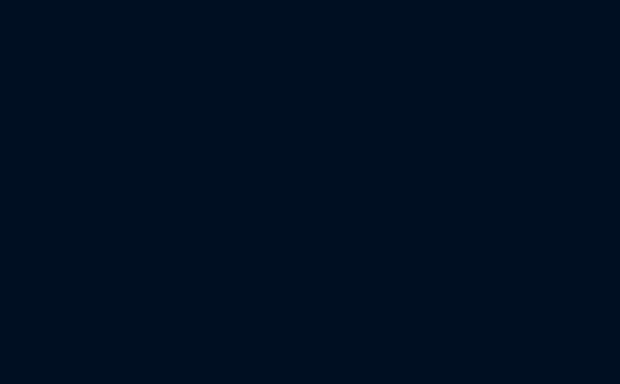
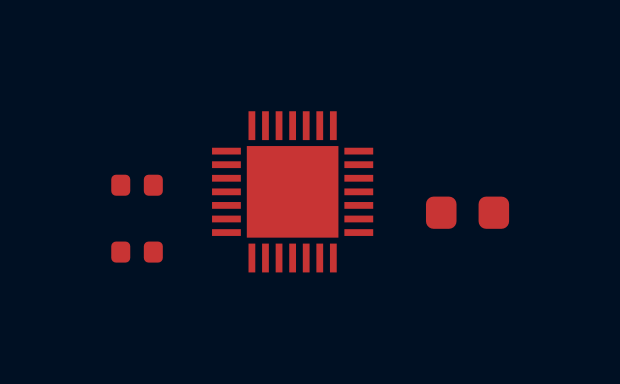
part: none -> (137, 185)
part: none -> (292, 191)
part: none -> (467, 212)
part: none -> (137, 252)

